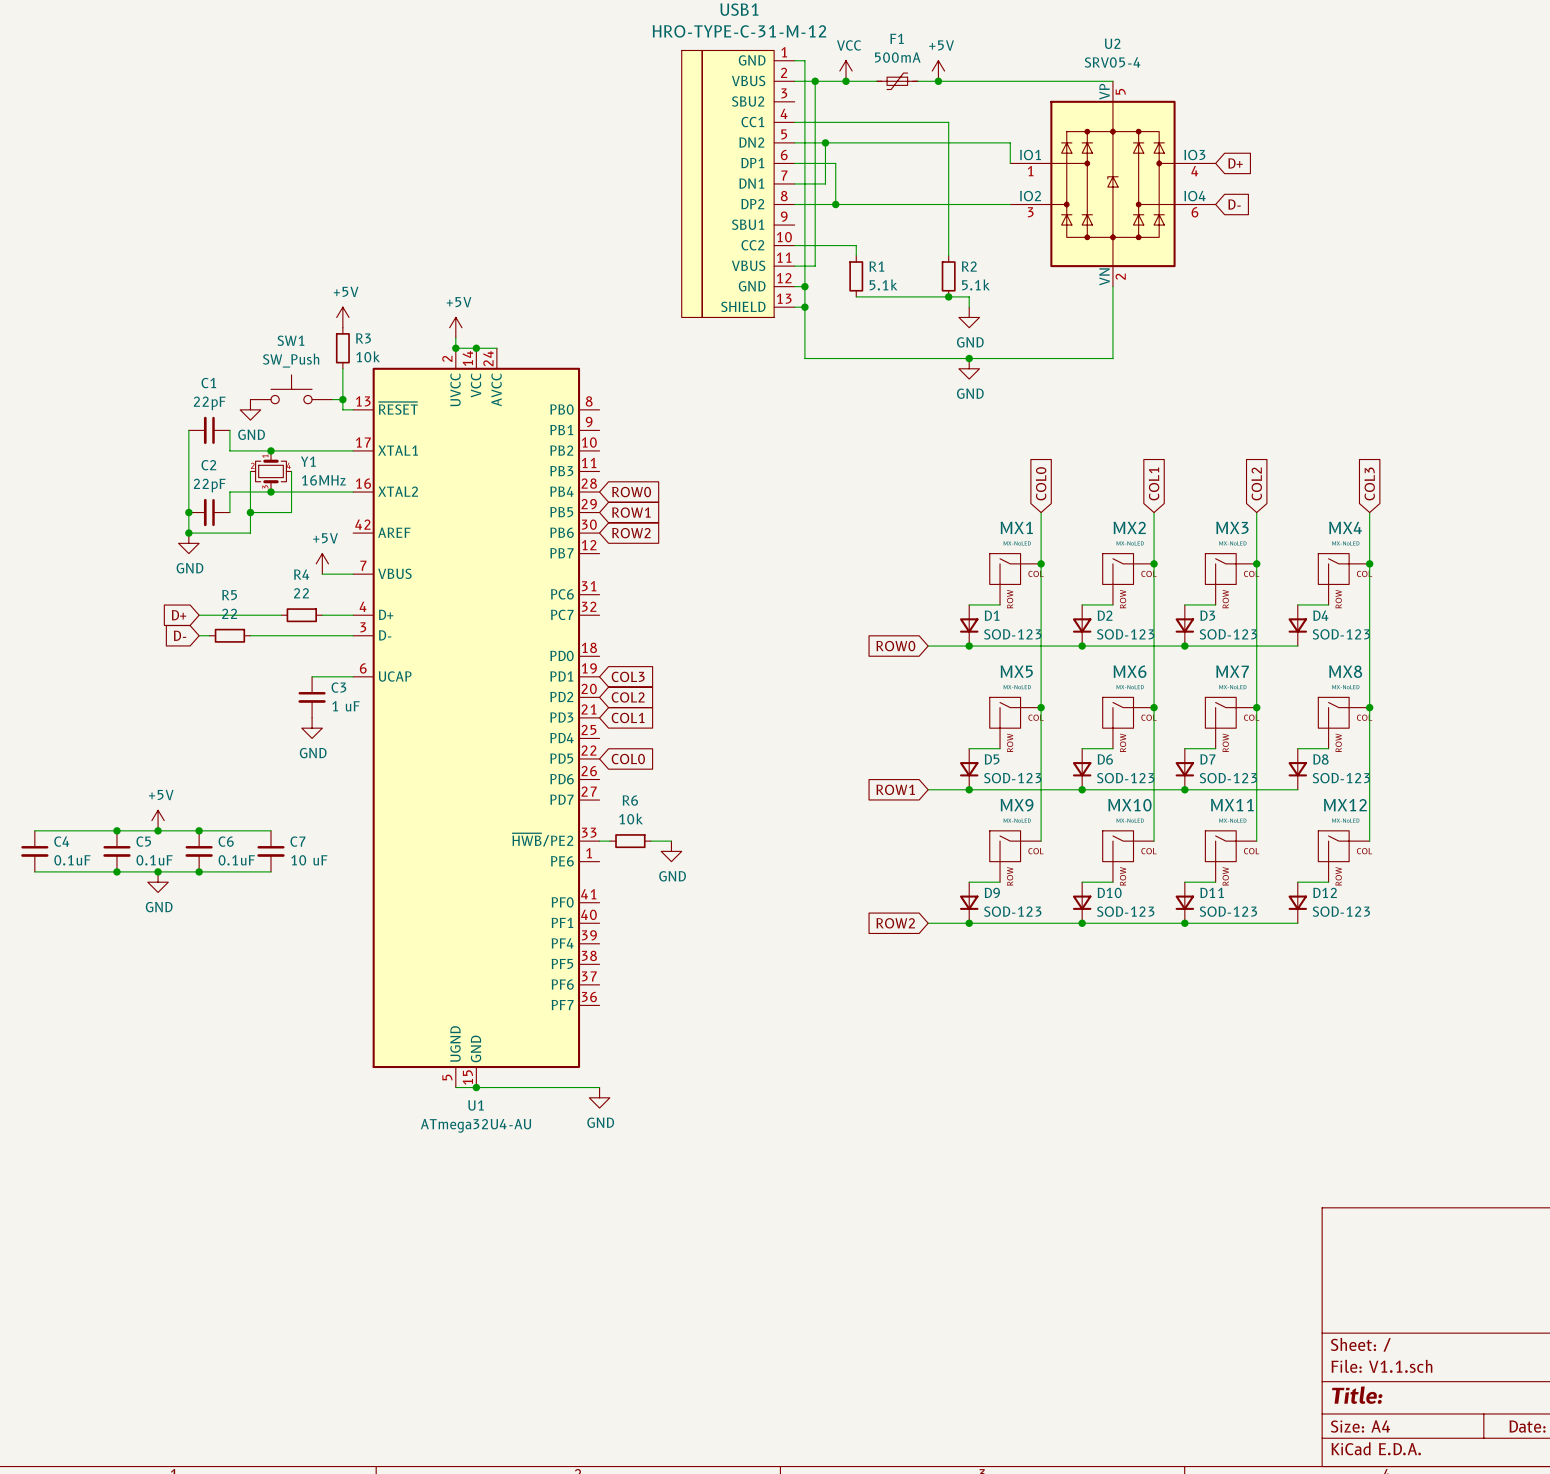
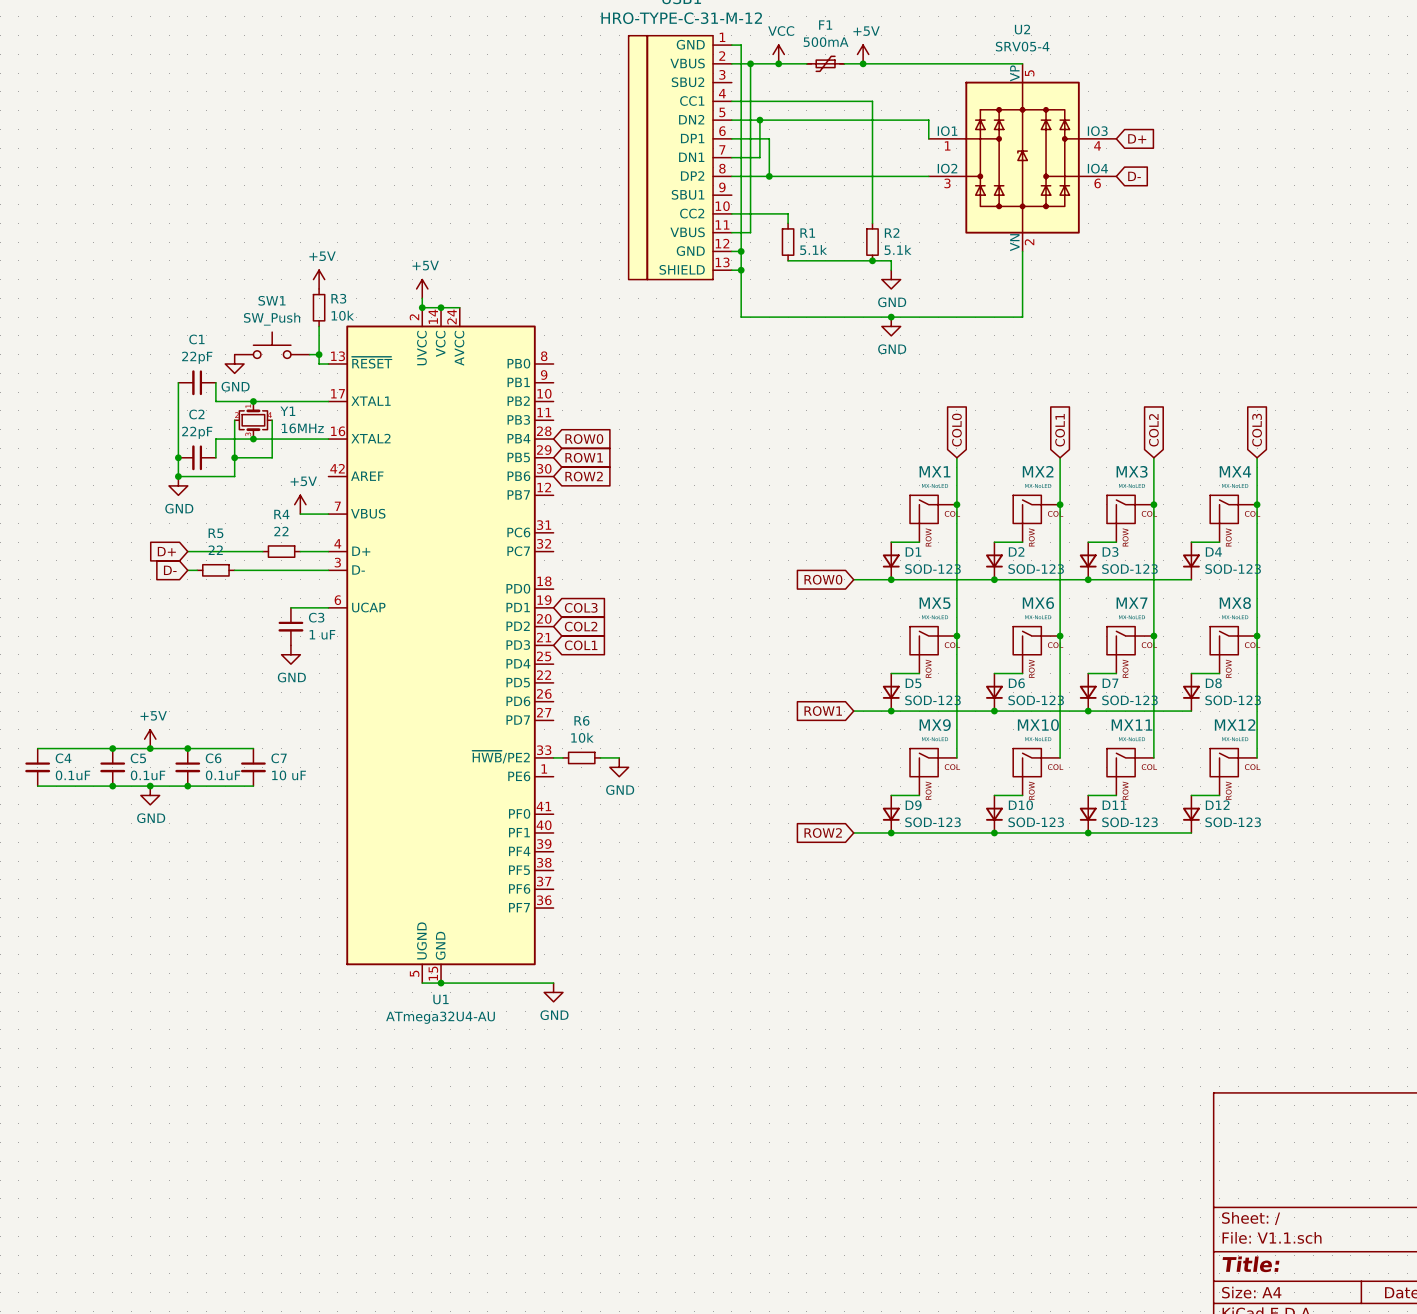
global label: COL0 (628, 759) -> none

